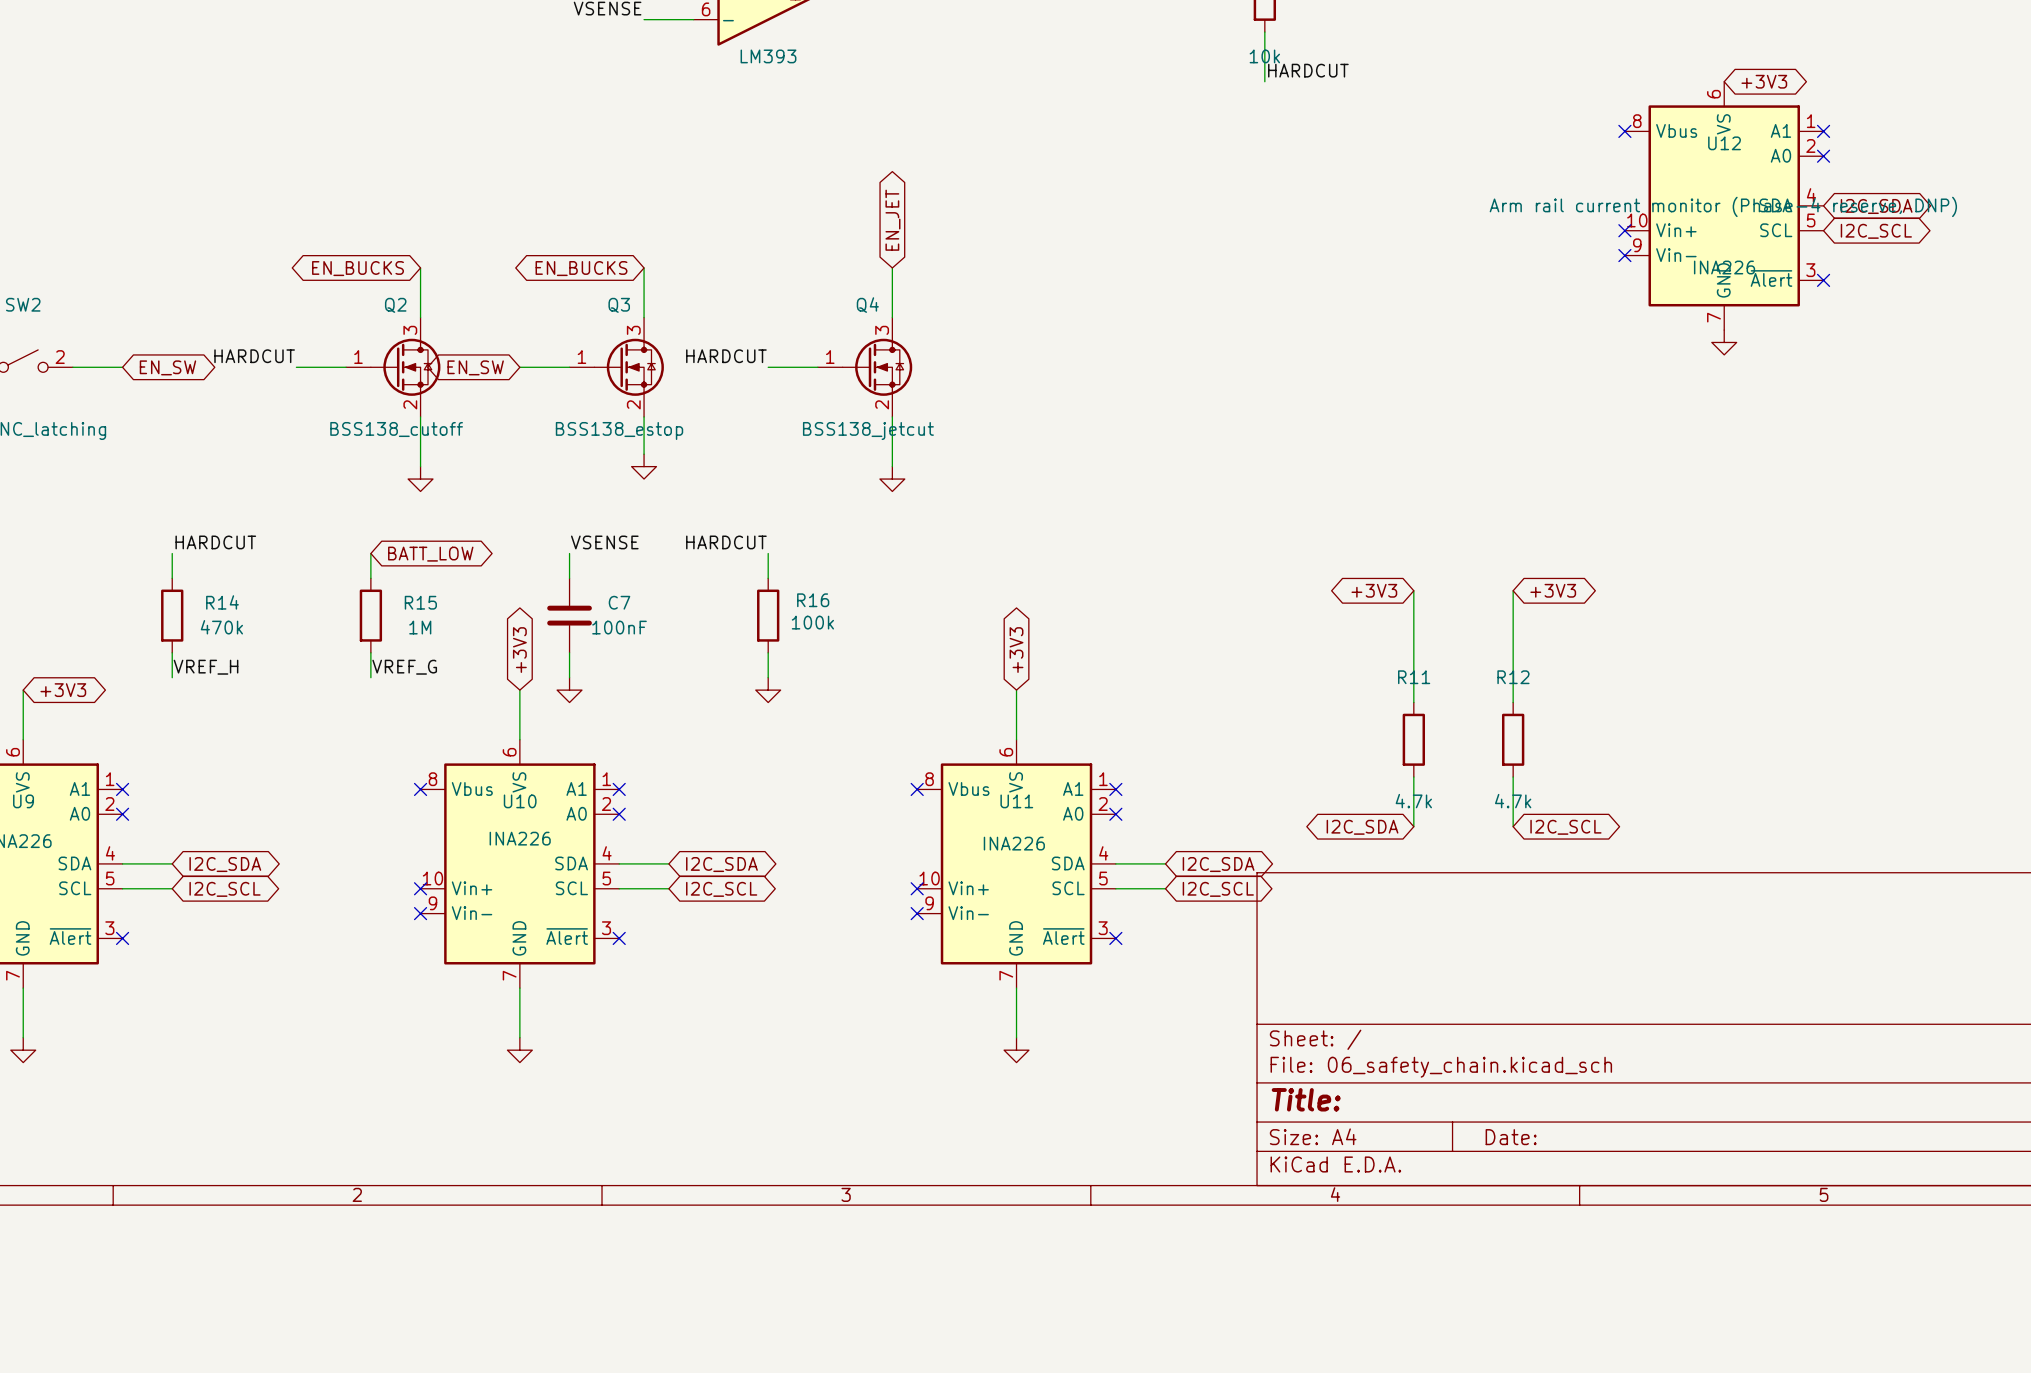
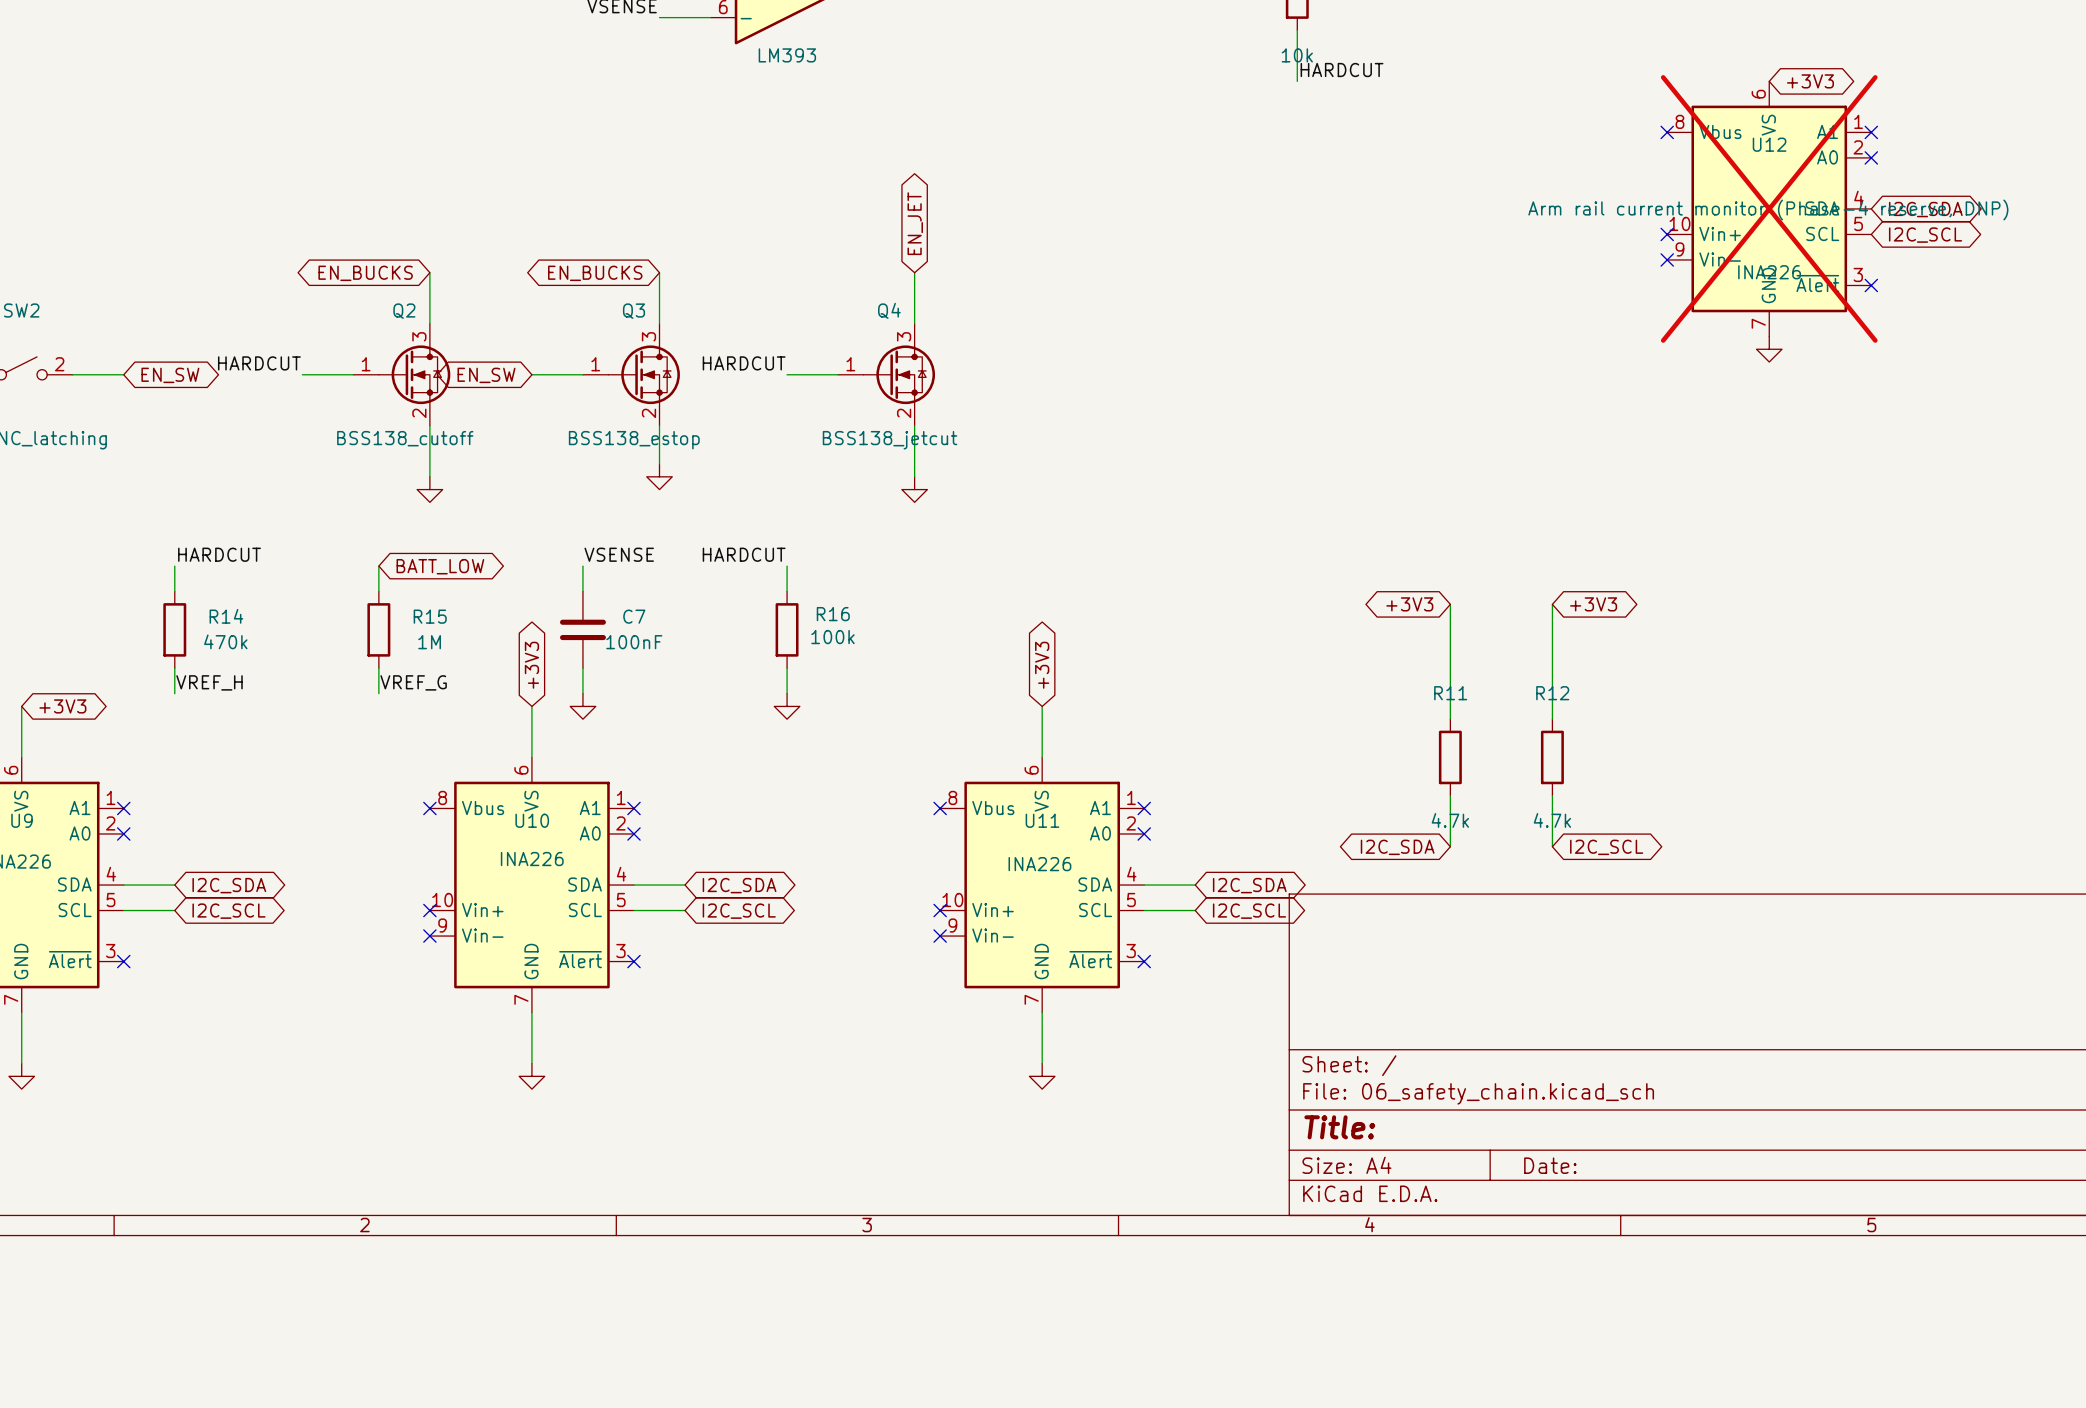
U12 do-not-place cross: none -> (1769, 208)

